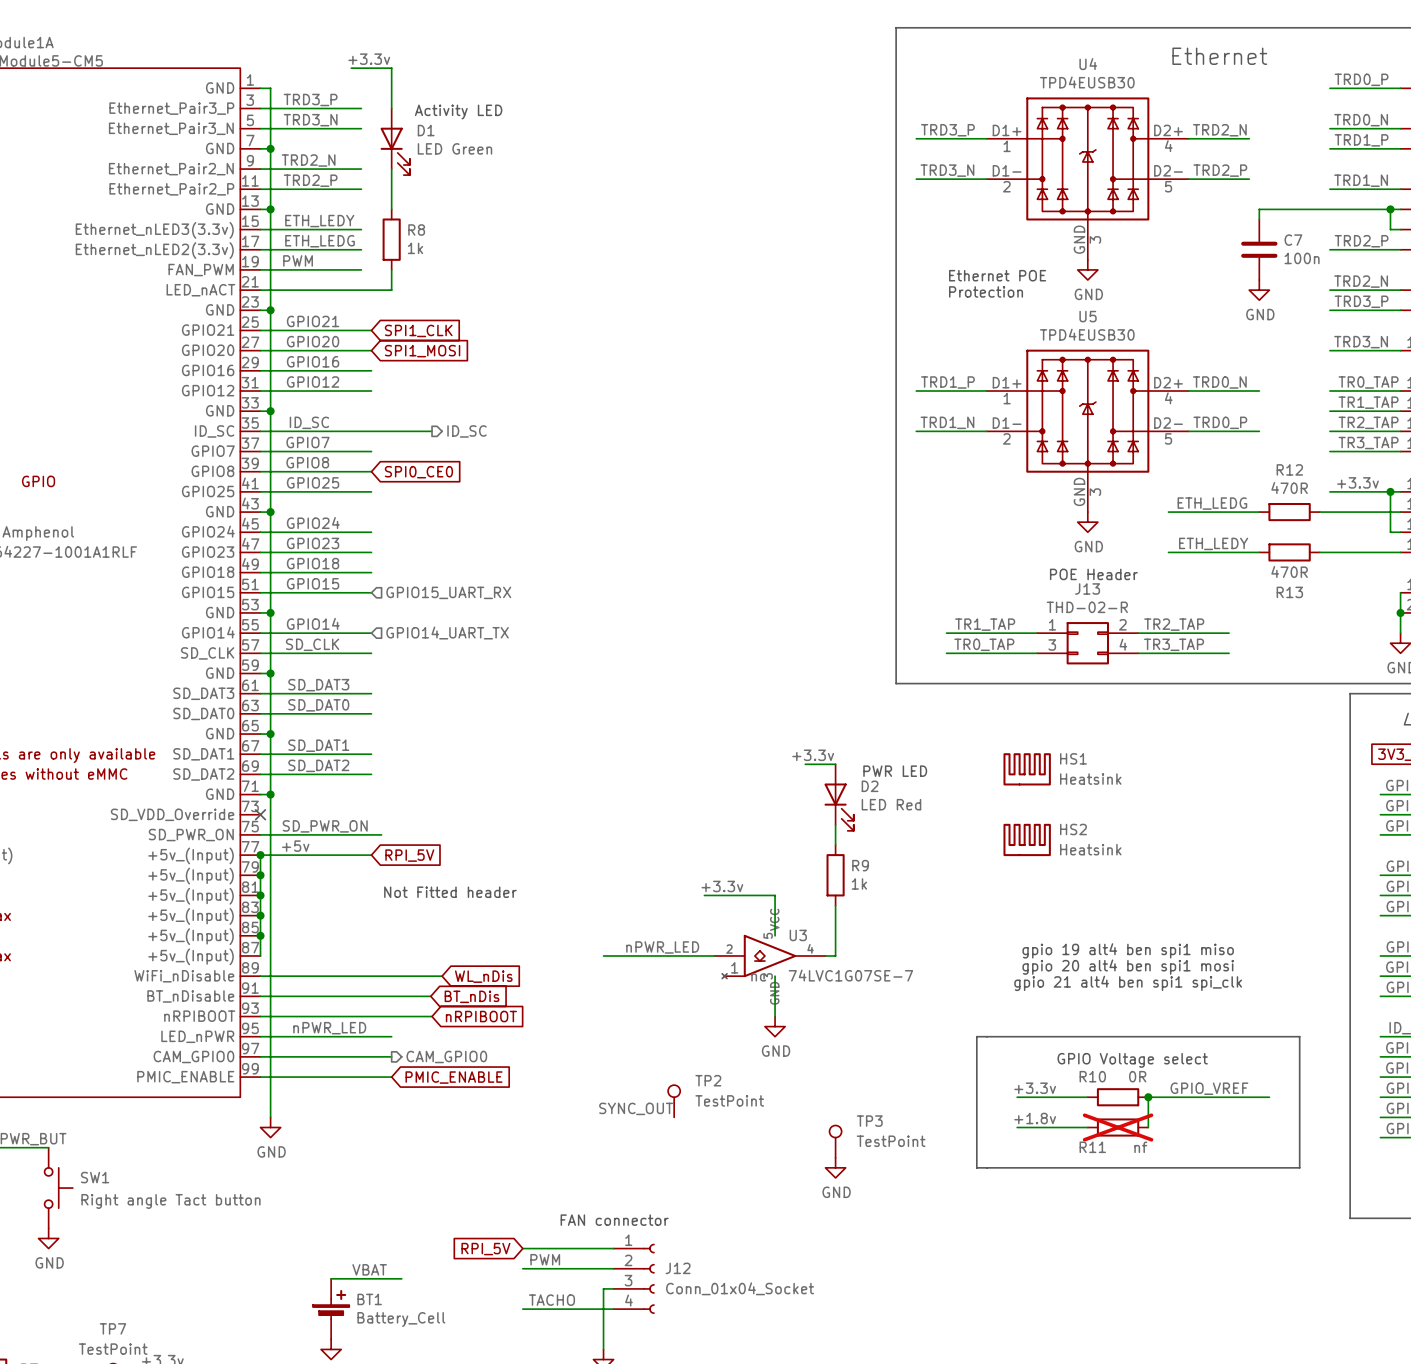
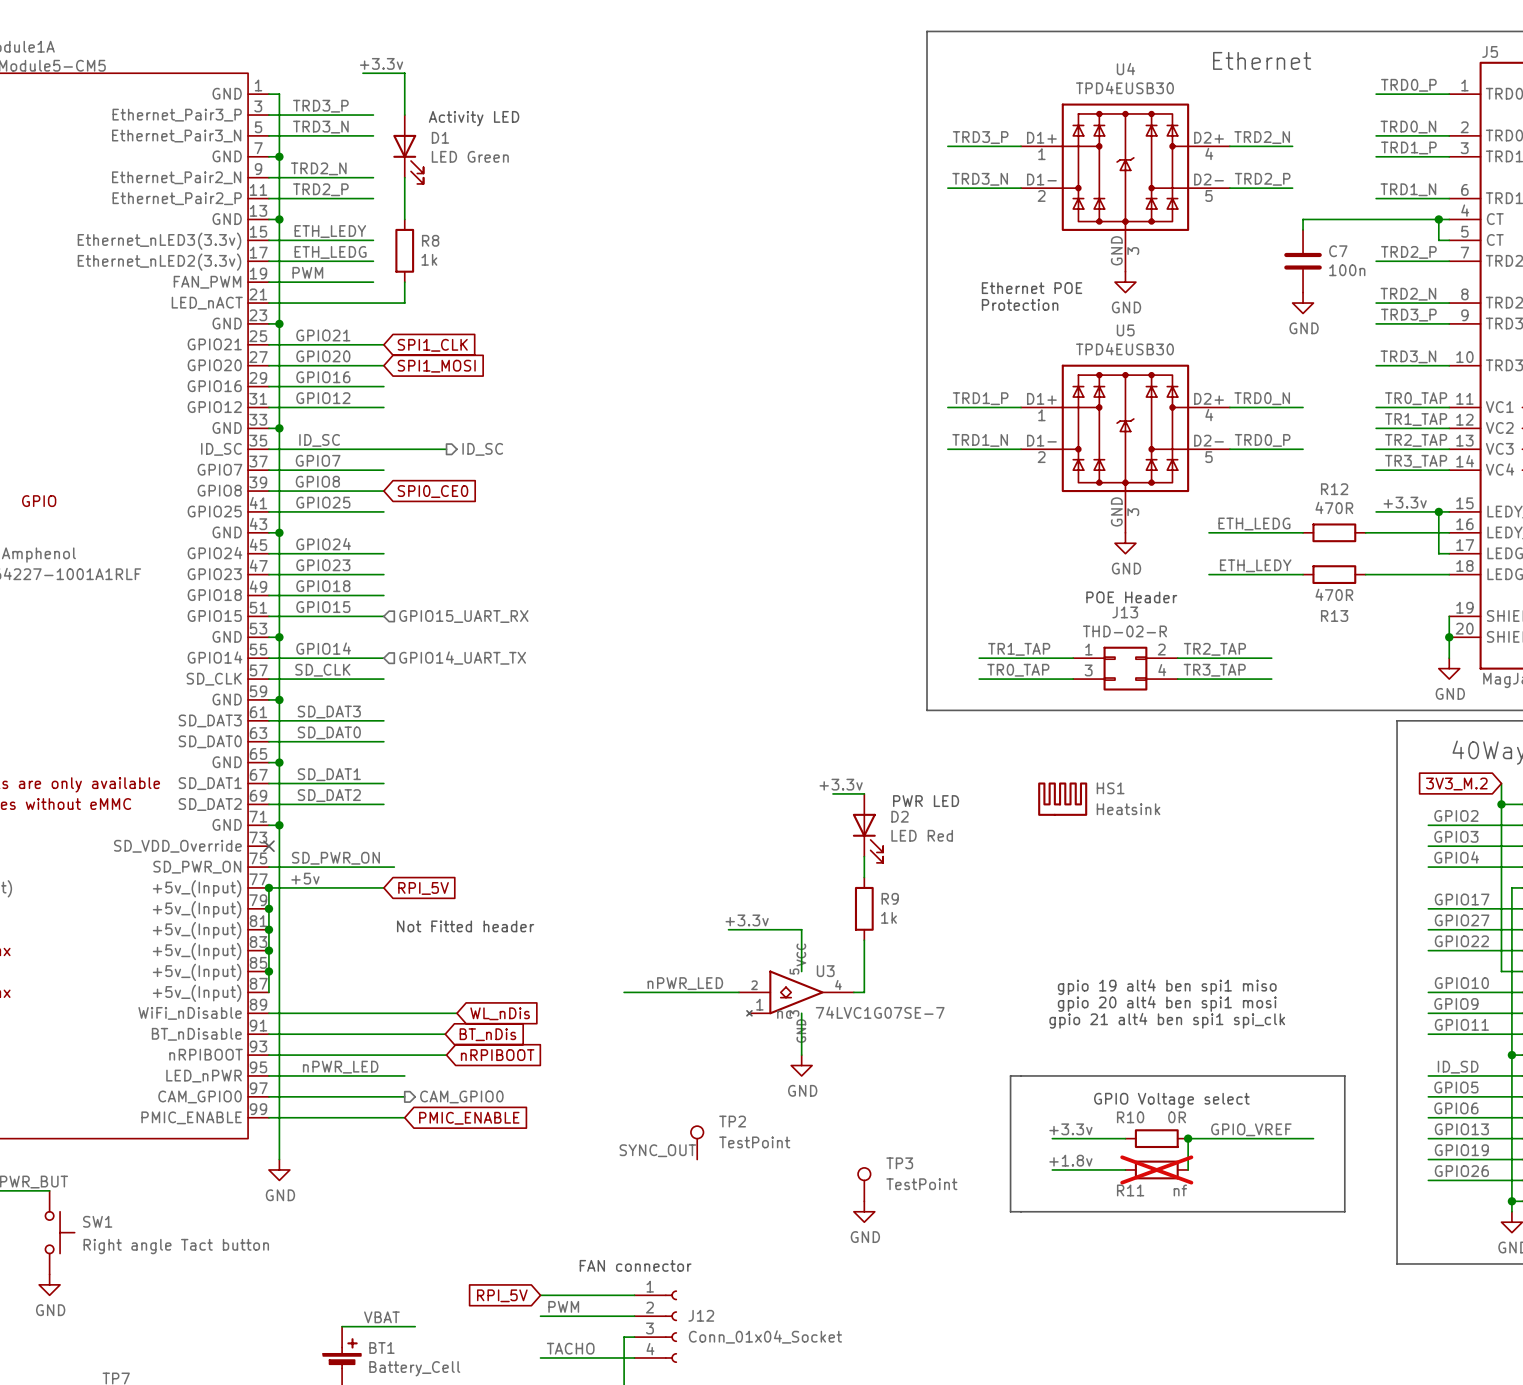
HS2: Heatsink (1027, 839) -> none

